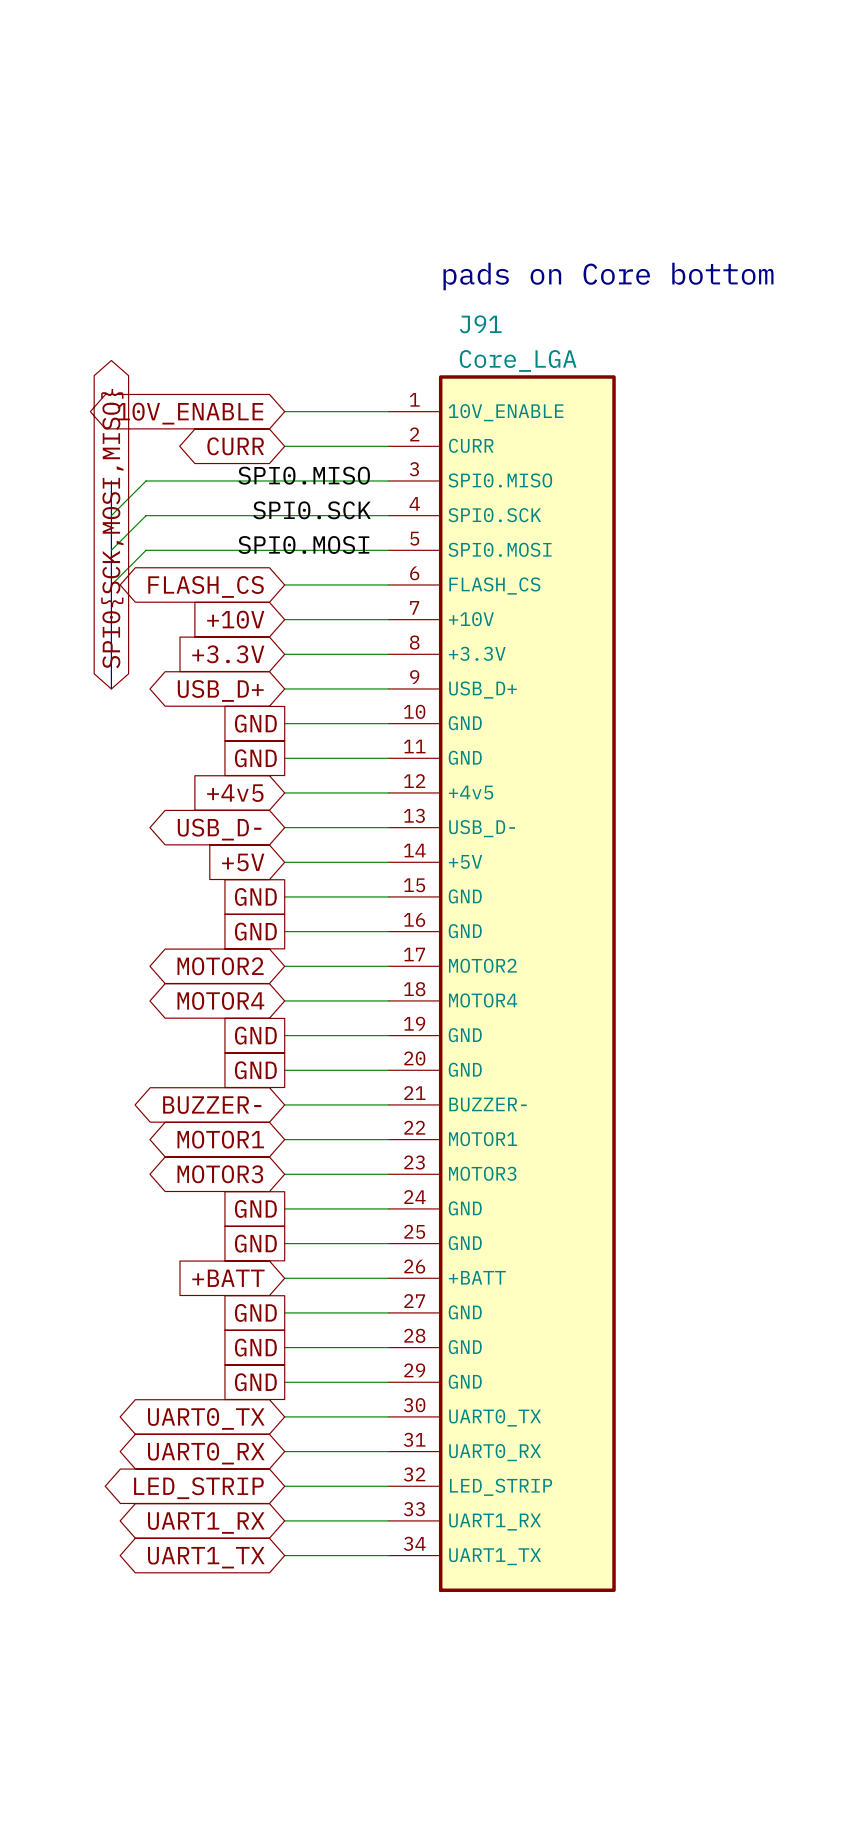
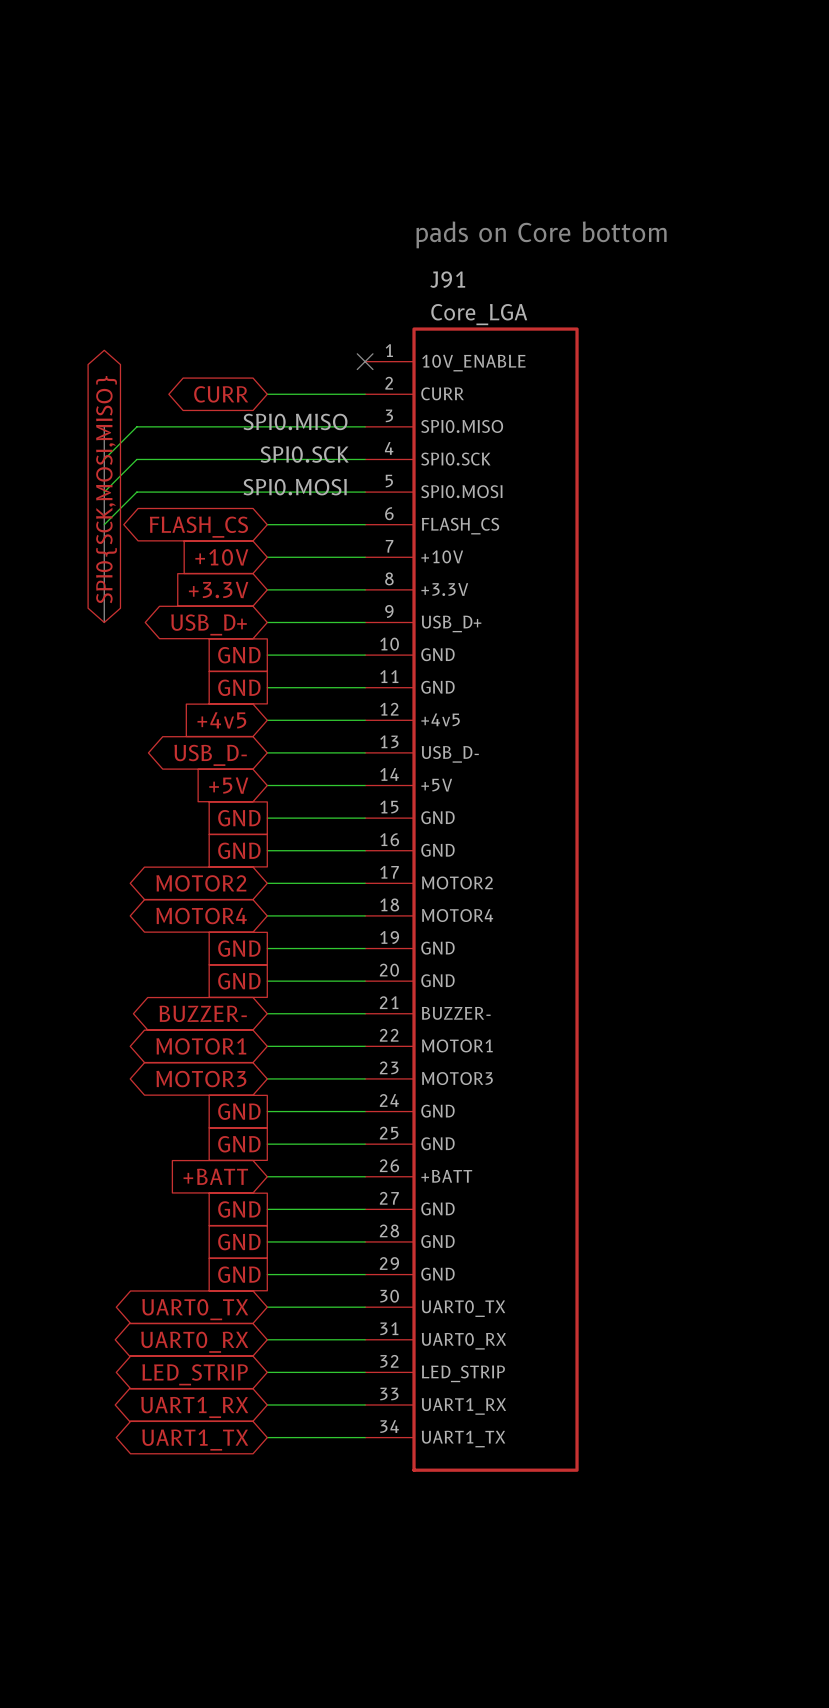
wire: (284, 411) (388, 411) -> none
no-connect mark: none -> (365, 361)
global label: 10V_ENABLE (190, 413) -> none

